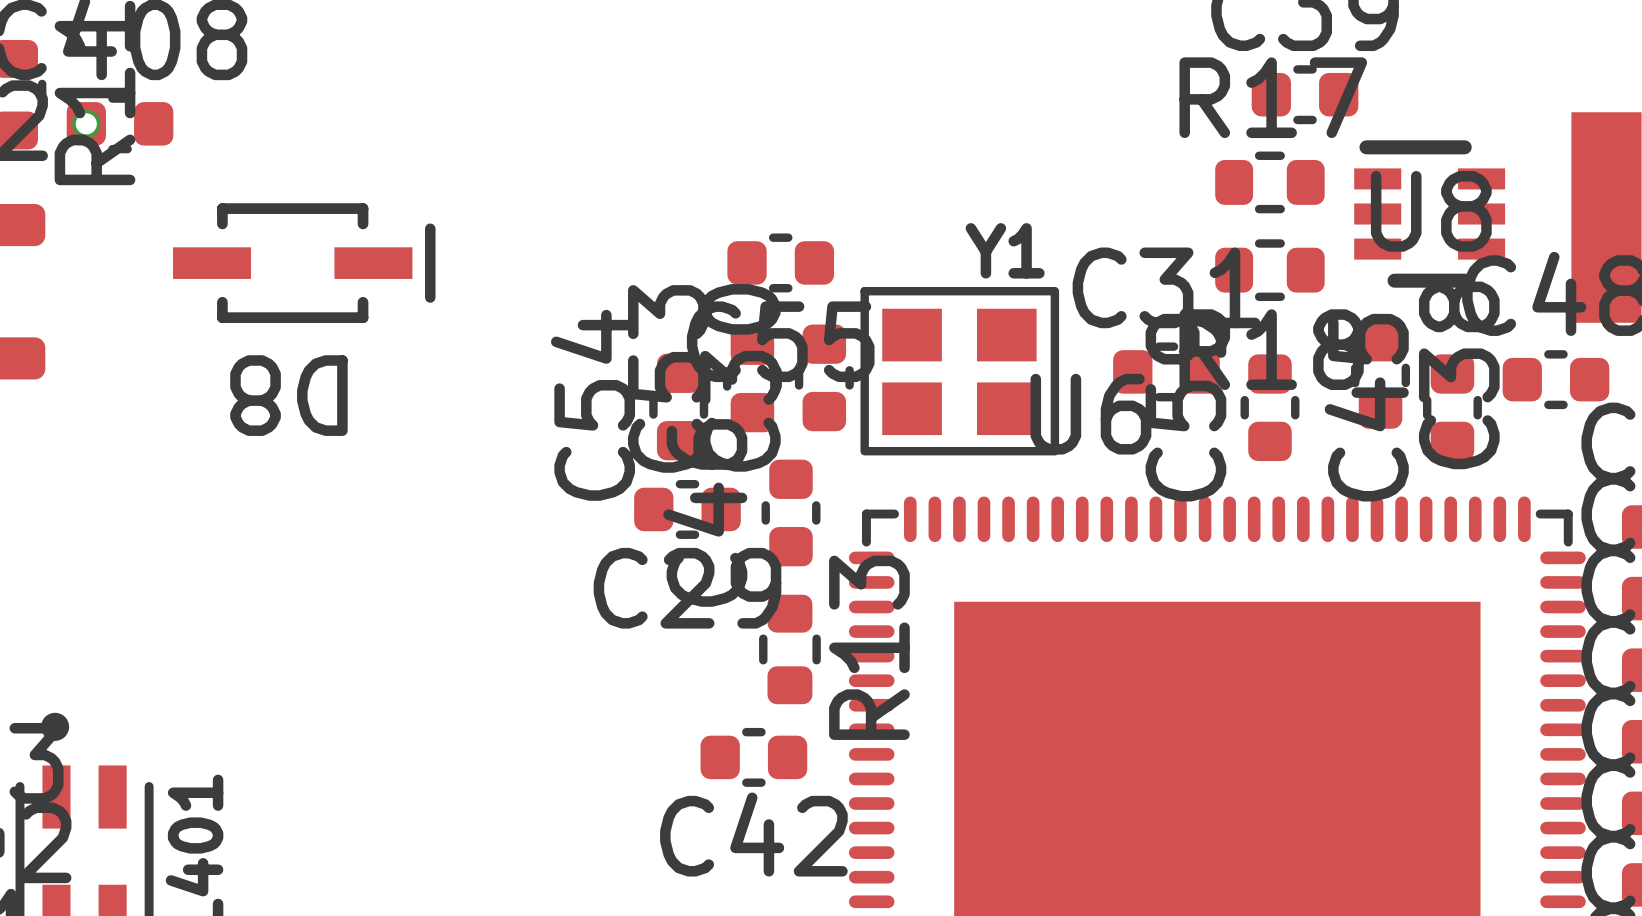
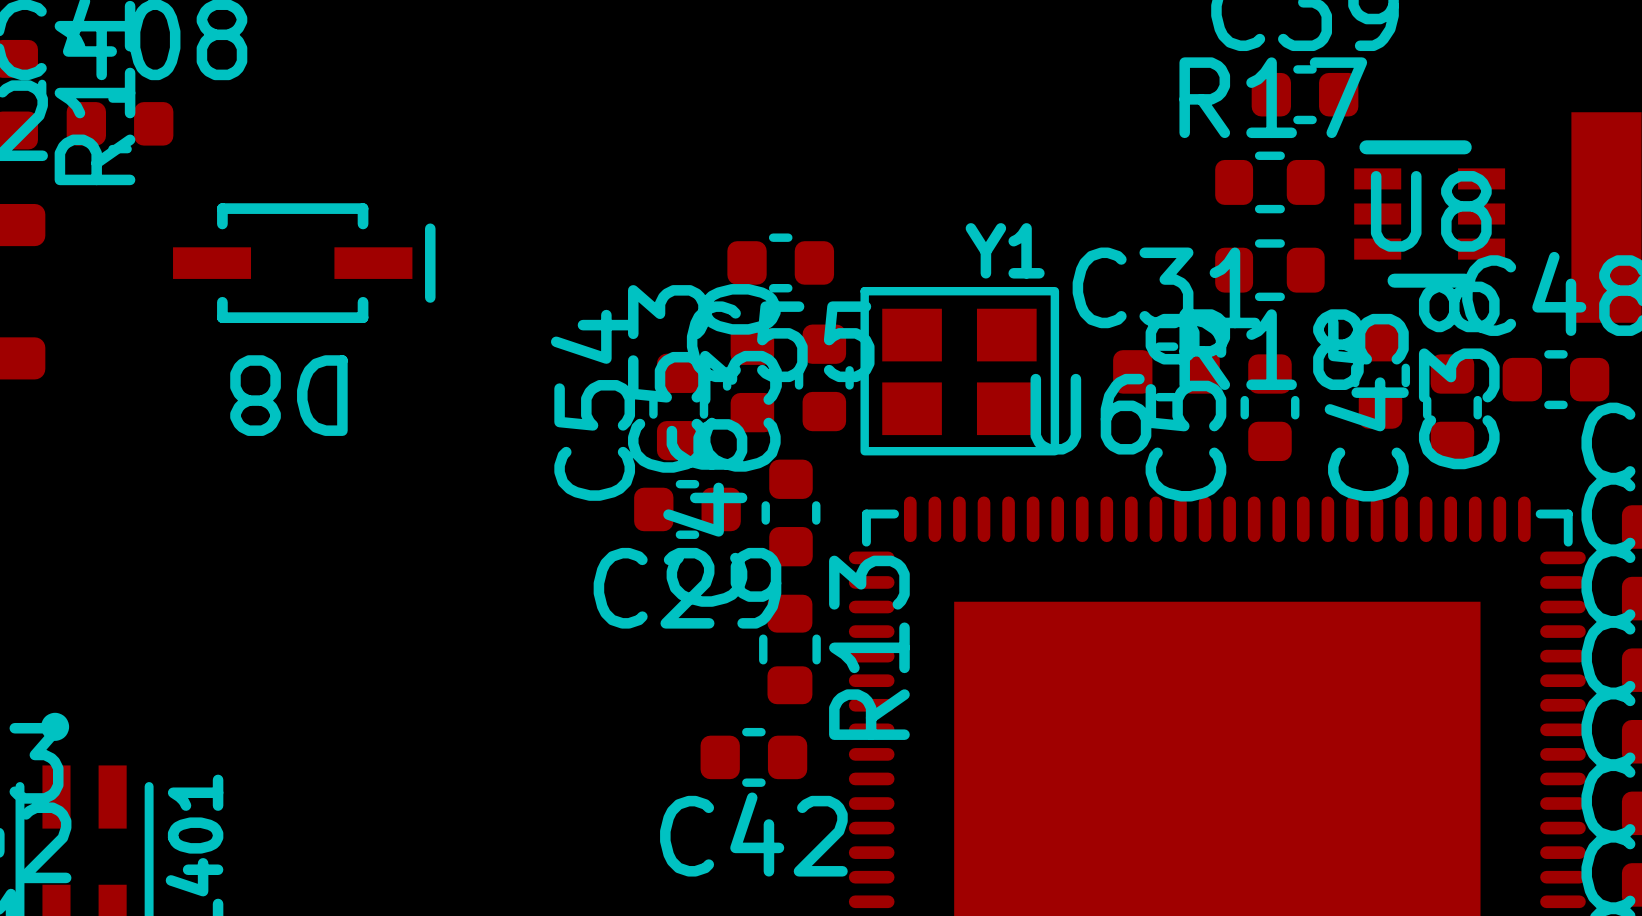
via: (86, 123) -> none

